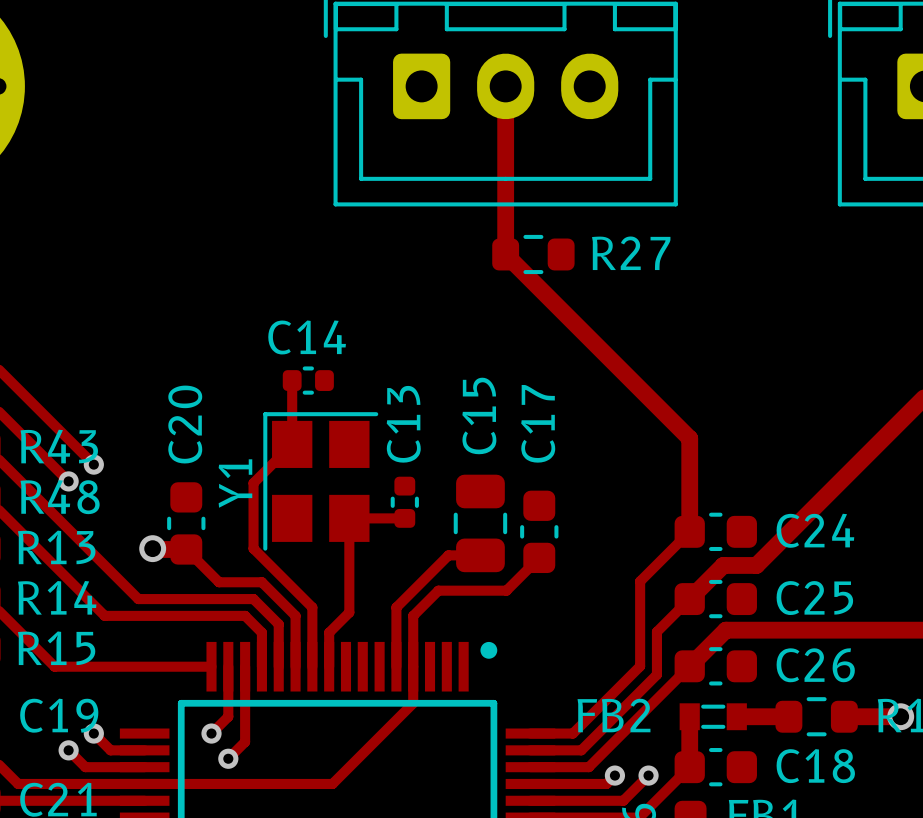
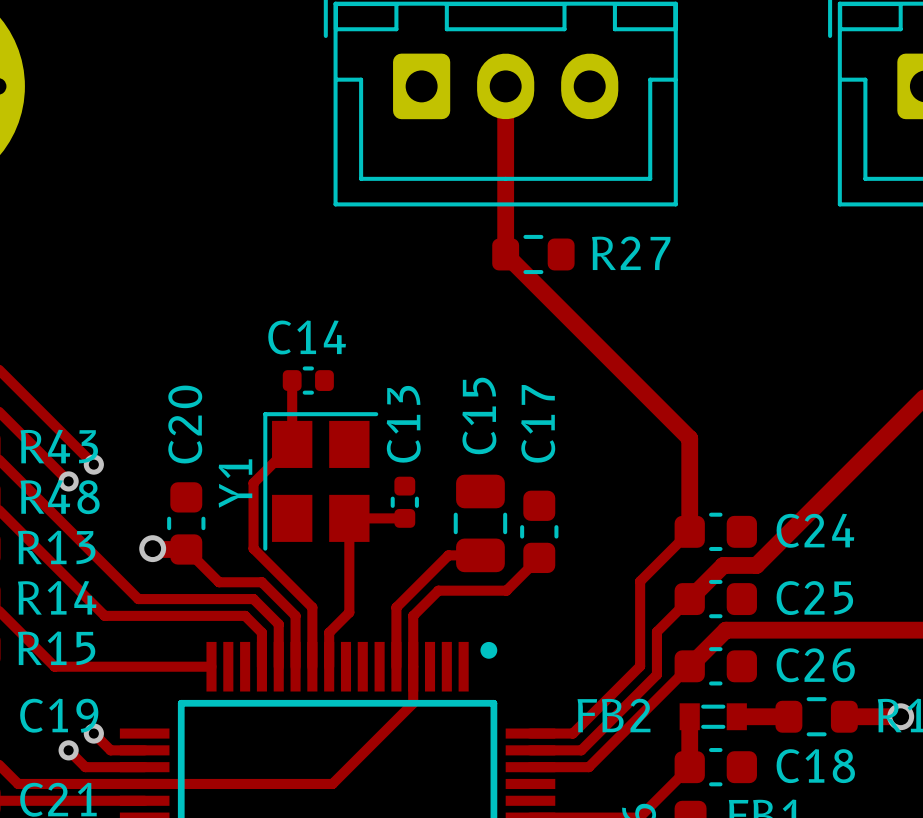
track: (228, 666) (228, 716) (211, 733) -> none
track: (245, 666) (245, 741) (228, 758) -> none
via: (211, 733) -> none
via: (228, 758) -> none
track: (614, 775) (606, 783) (530, 783) -> none
via: (614, 775) -> none
track: (648, 775) (623, 800) (530, 800) -> none
via: (648, 775) -> none

